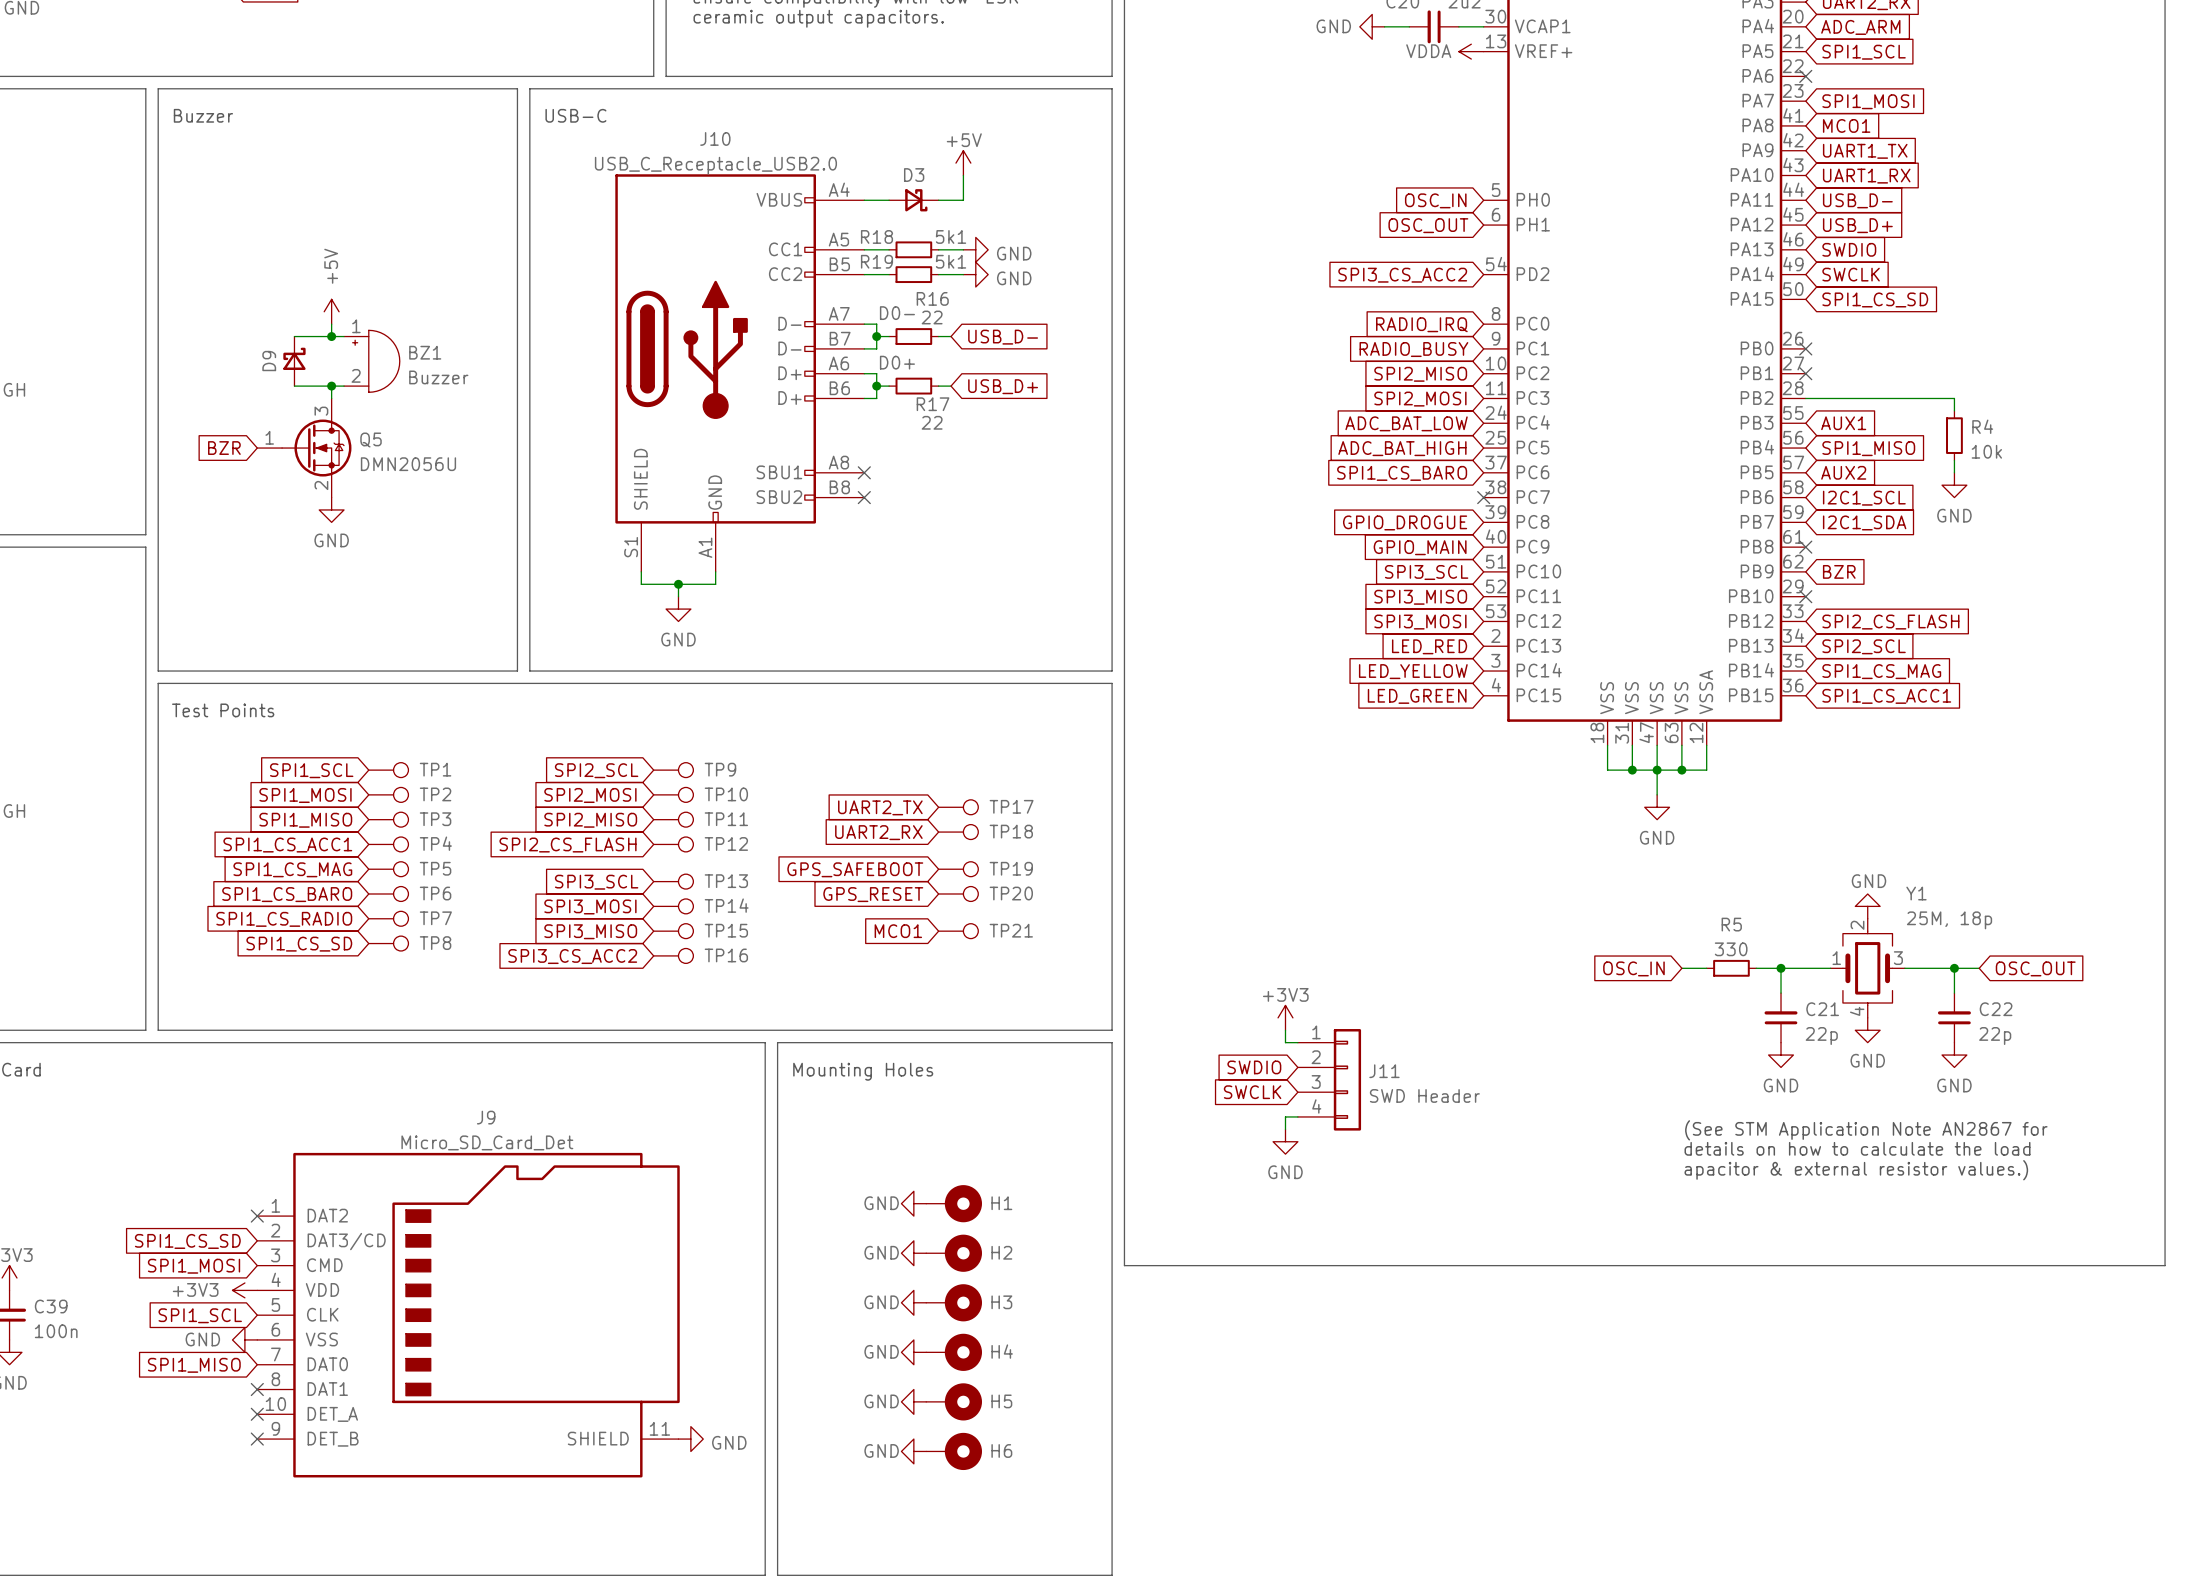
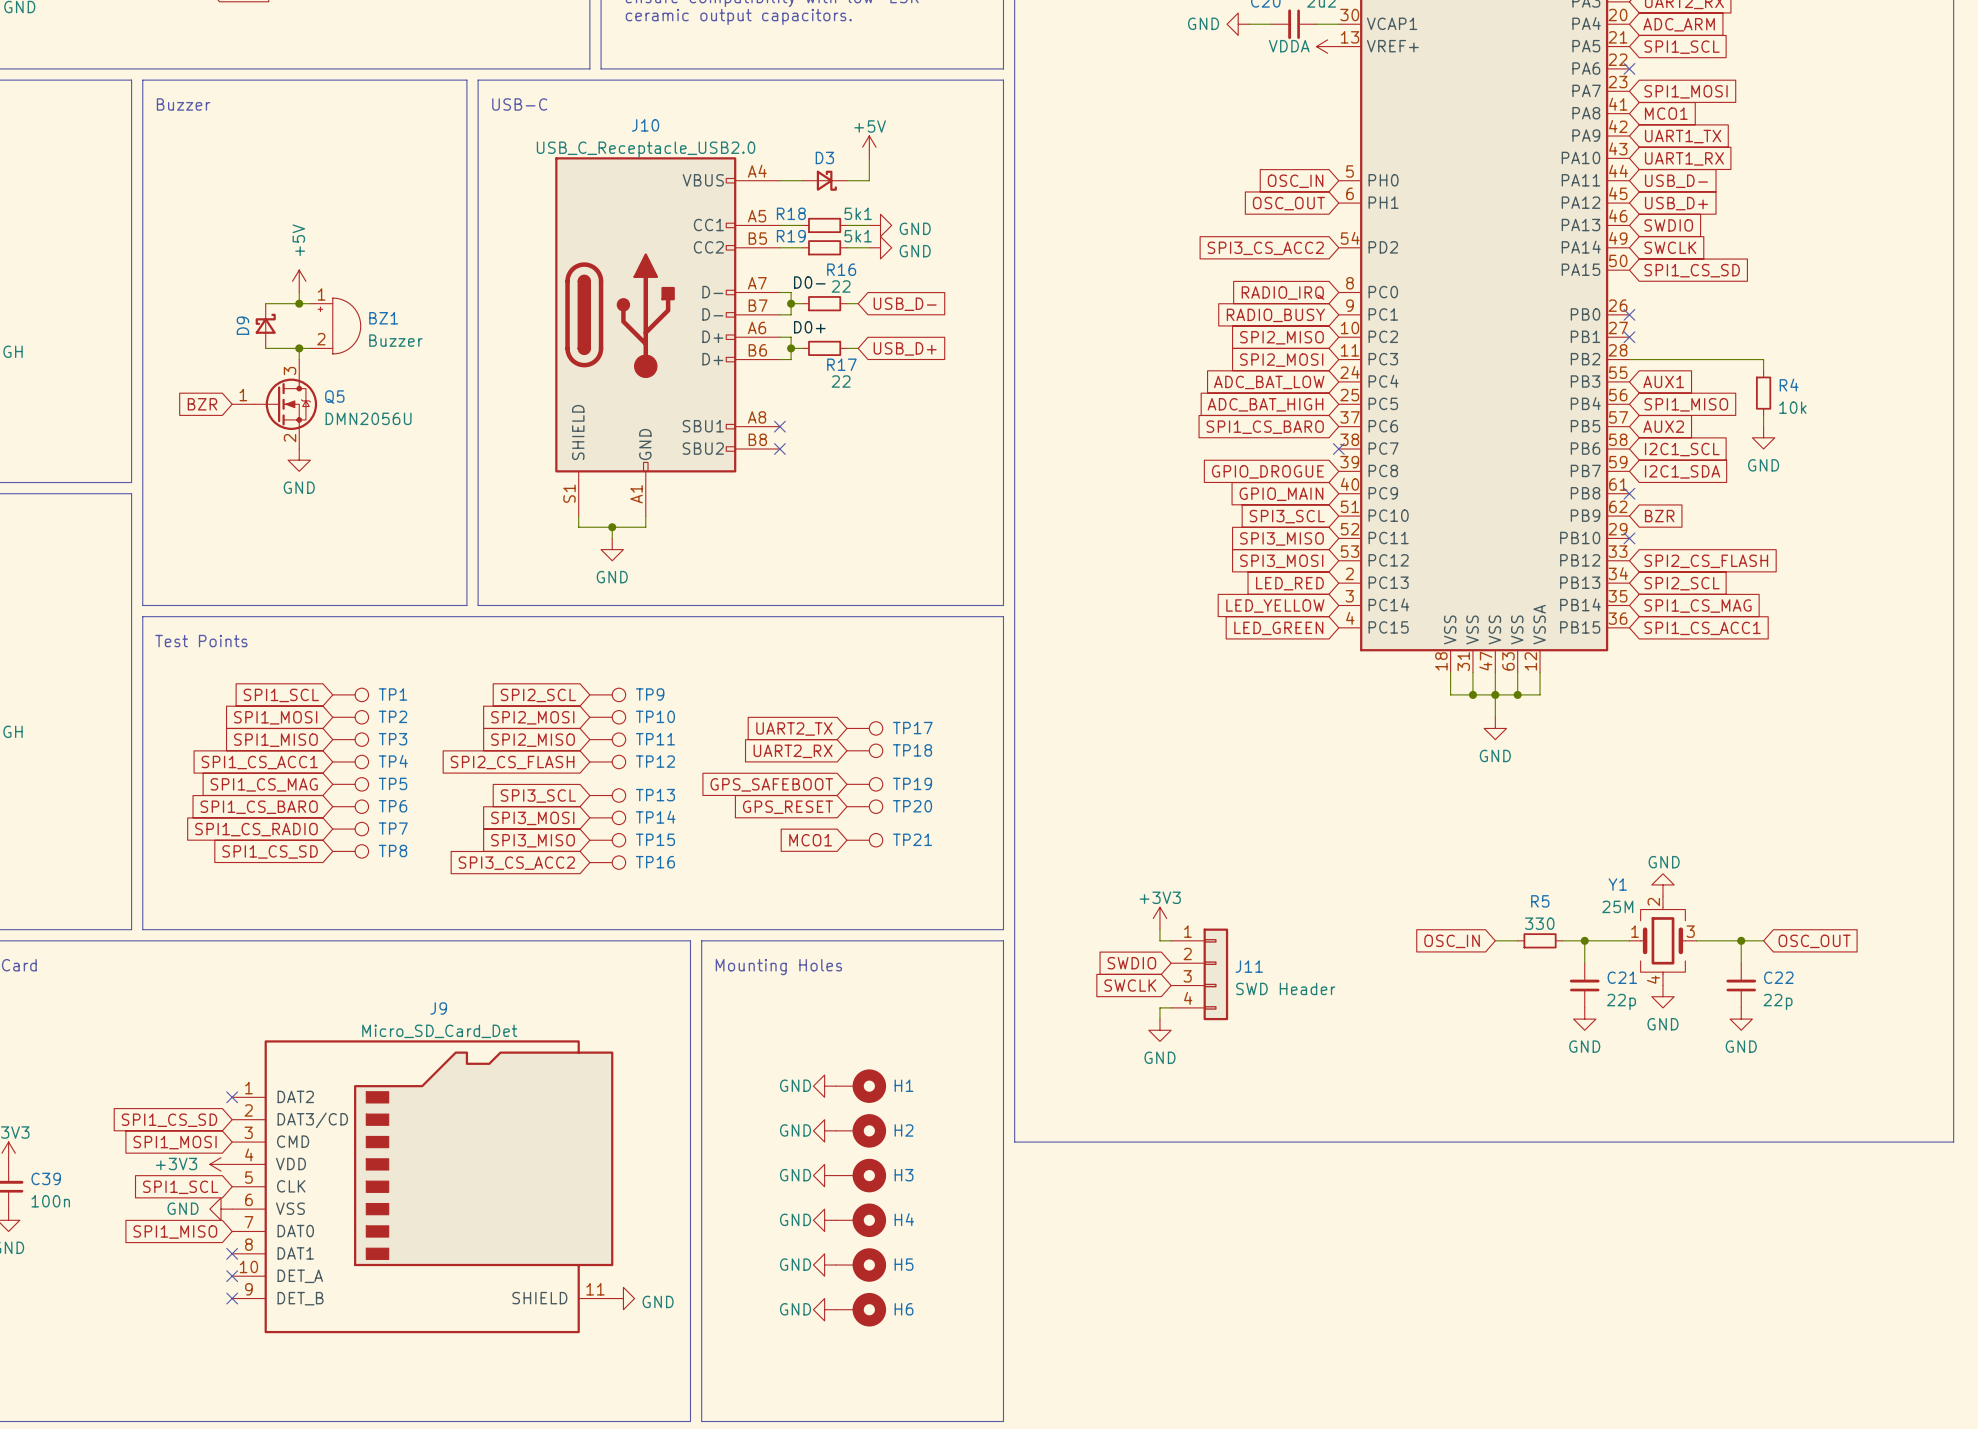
Y1 name position: Y1 (1916, 893) -> Y1 (1617, 884)
power symbol: GND (1867, 906) -> none
Y1 value: 25M, 18p (1949, 920) -> 25M (1617, 906)
global label position: OSC_IN (1633, 968) -> OSC_IN (1452, 941)
wire: (1681, 968) (1706, 968) -> (1495, 940) (1517, 940)
R5 position: (1731, 968) -> (1540, 940)
wire: (1756, 968) (1830, 968) -> (1562, 940) (1629, 940)
wire: (1781, 968) (1781, 993) -> (1584, 940) (1584, 963)
junction: (1781, 968) -> none
Y1 position: (1867, 968) -> (1662, 940)
wire: (1904, 968) (1979, 968) -> (1696, 940) (1763, 940)
wire: (1954, 968) (1954, 993) -> (1741, 940) (1741, 963)
junction: (1954, 968) -> none
global label position: OSC_OUT (2035, 968) -> OSC_OUT (1814, 941)
power symbol: none -> GND (1662, 884)
C21 position: (1781, 1017) -> (1584, 985)
C22 position: (1954, 1017) -> (1741, 985)
power symbol: GND (1867, 1030) -> none
junction: none -> (1584, 940)
junction: none -> (1741, 940)
power symbol: GND (1781, 1055) -> none
power symbol: GND (1954, 1055) -> none
power symbol: none -> GND (1662, 996)
power symbol: none -> GND (1584, 1019)
power symbol: none -> GND (1741, 1019)
text: (See STM Application Note AN2867 for (1866, 1130) -> none
text: details on how to calculate the load (1857, 1148) -> none
text: apacitor & external resistor values.) (1856, 1170) -> none

